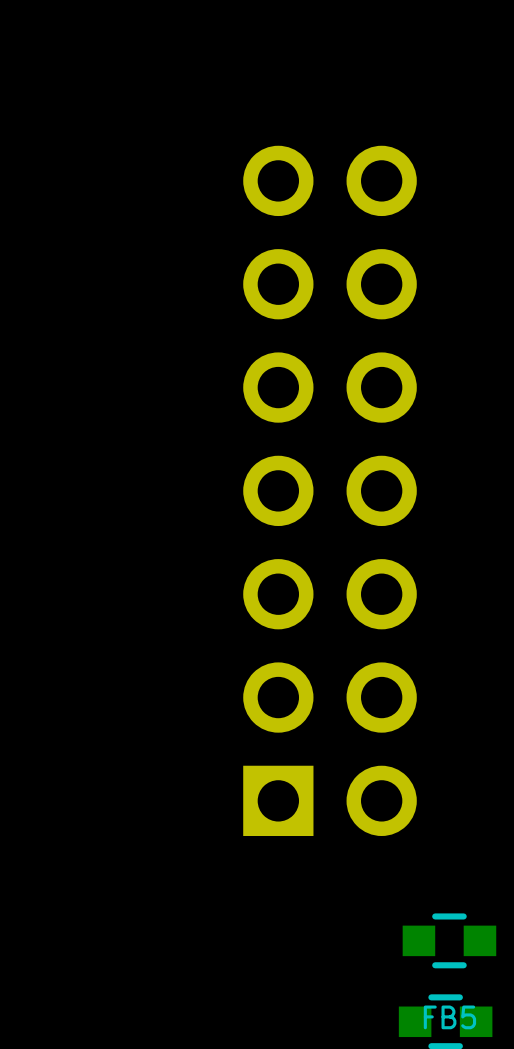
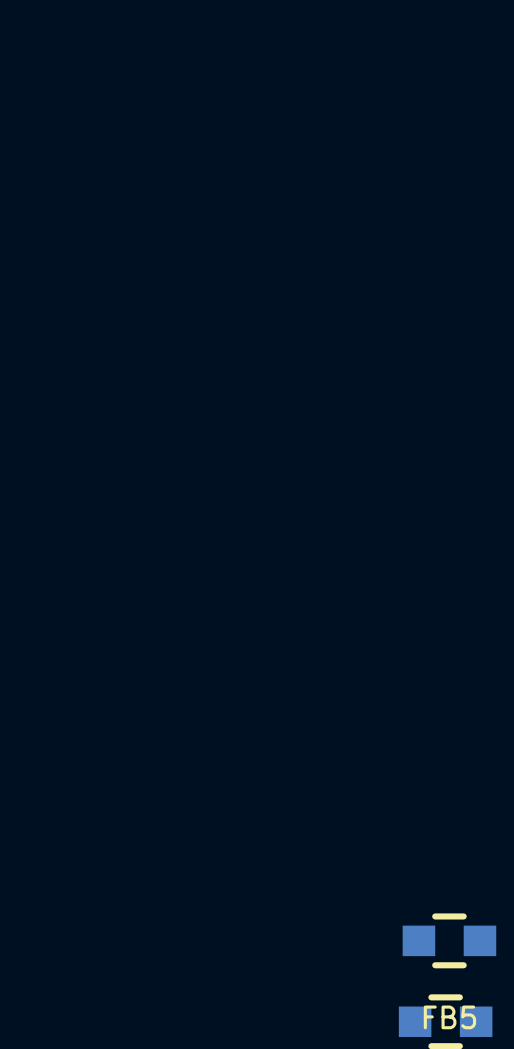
part: (330, 490) -> none

